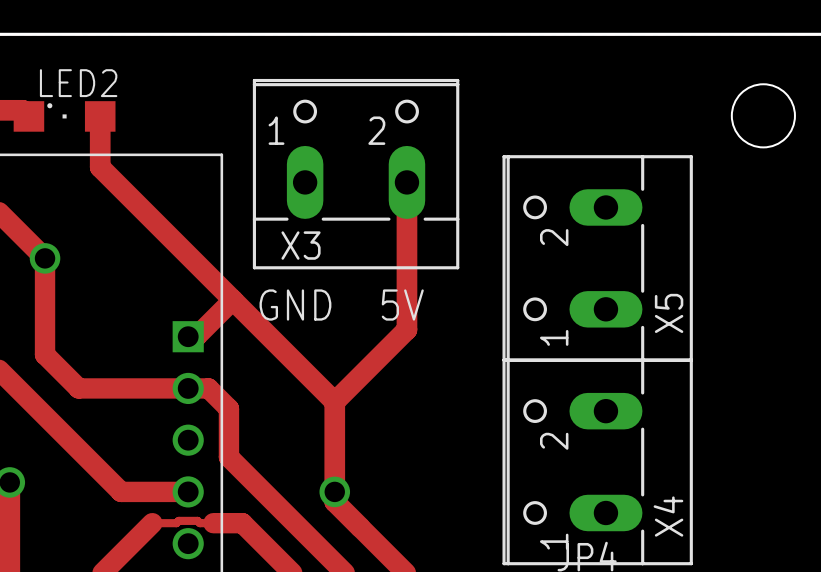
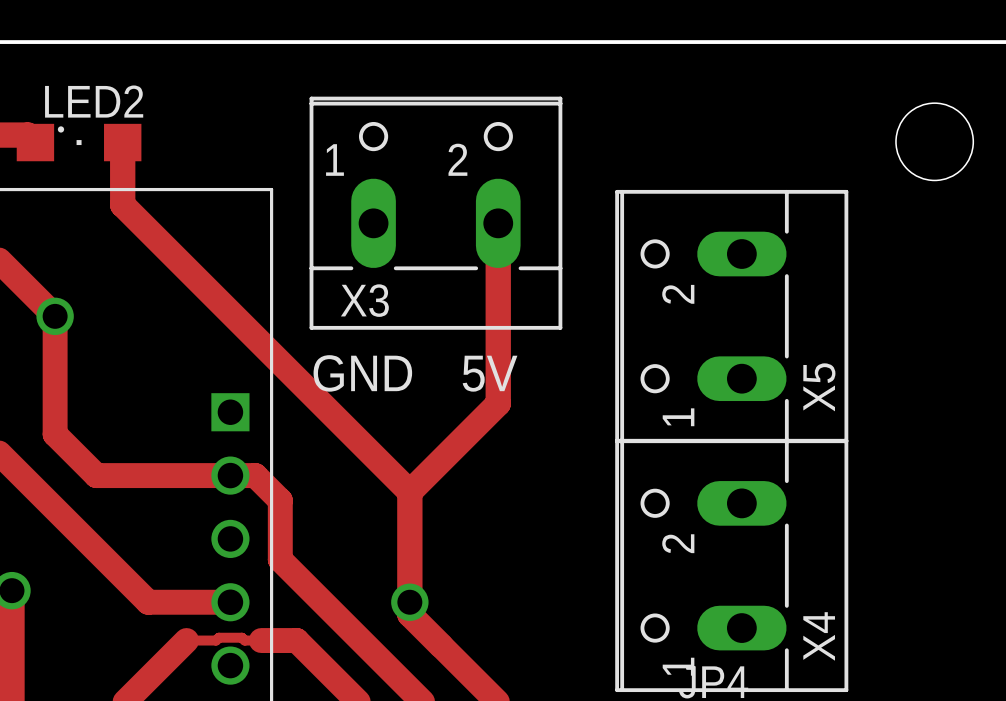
track: (232, 300) (196, 336) (188, 336) -> none

